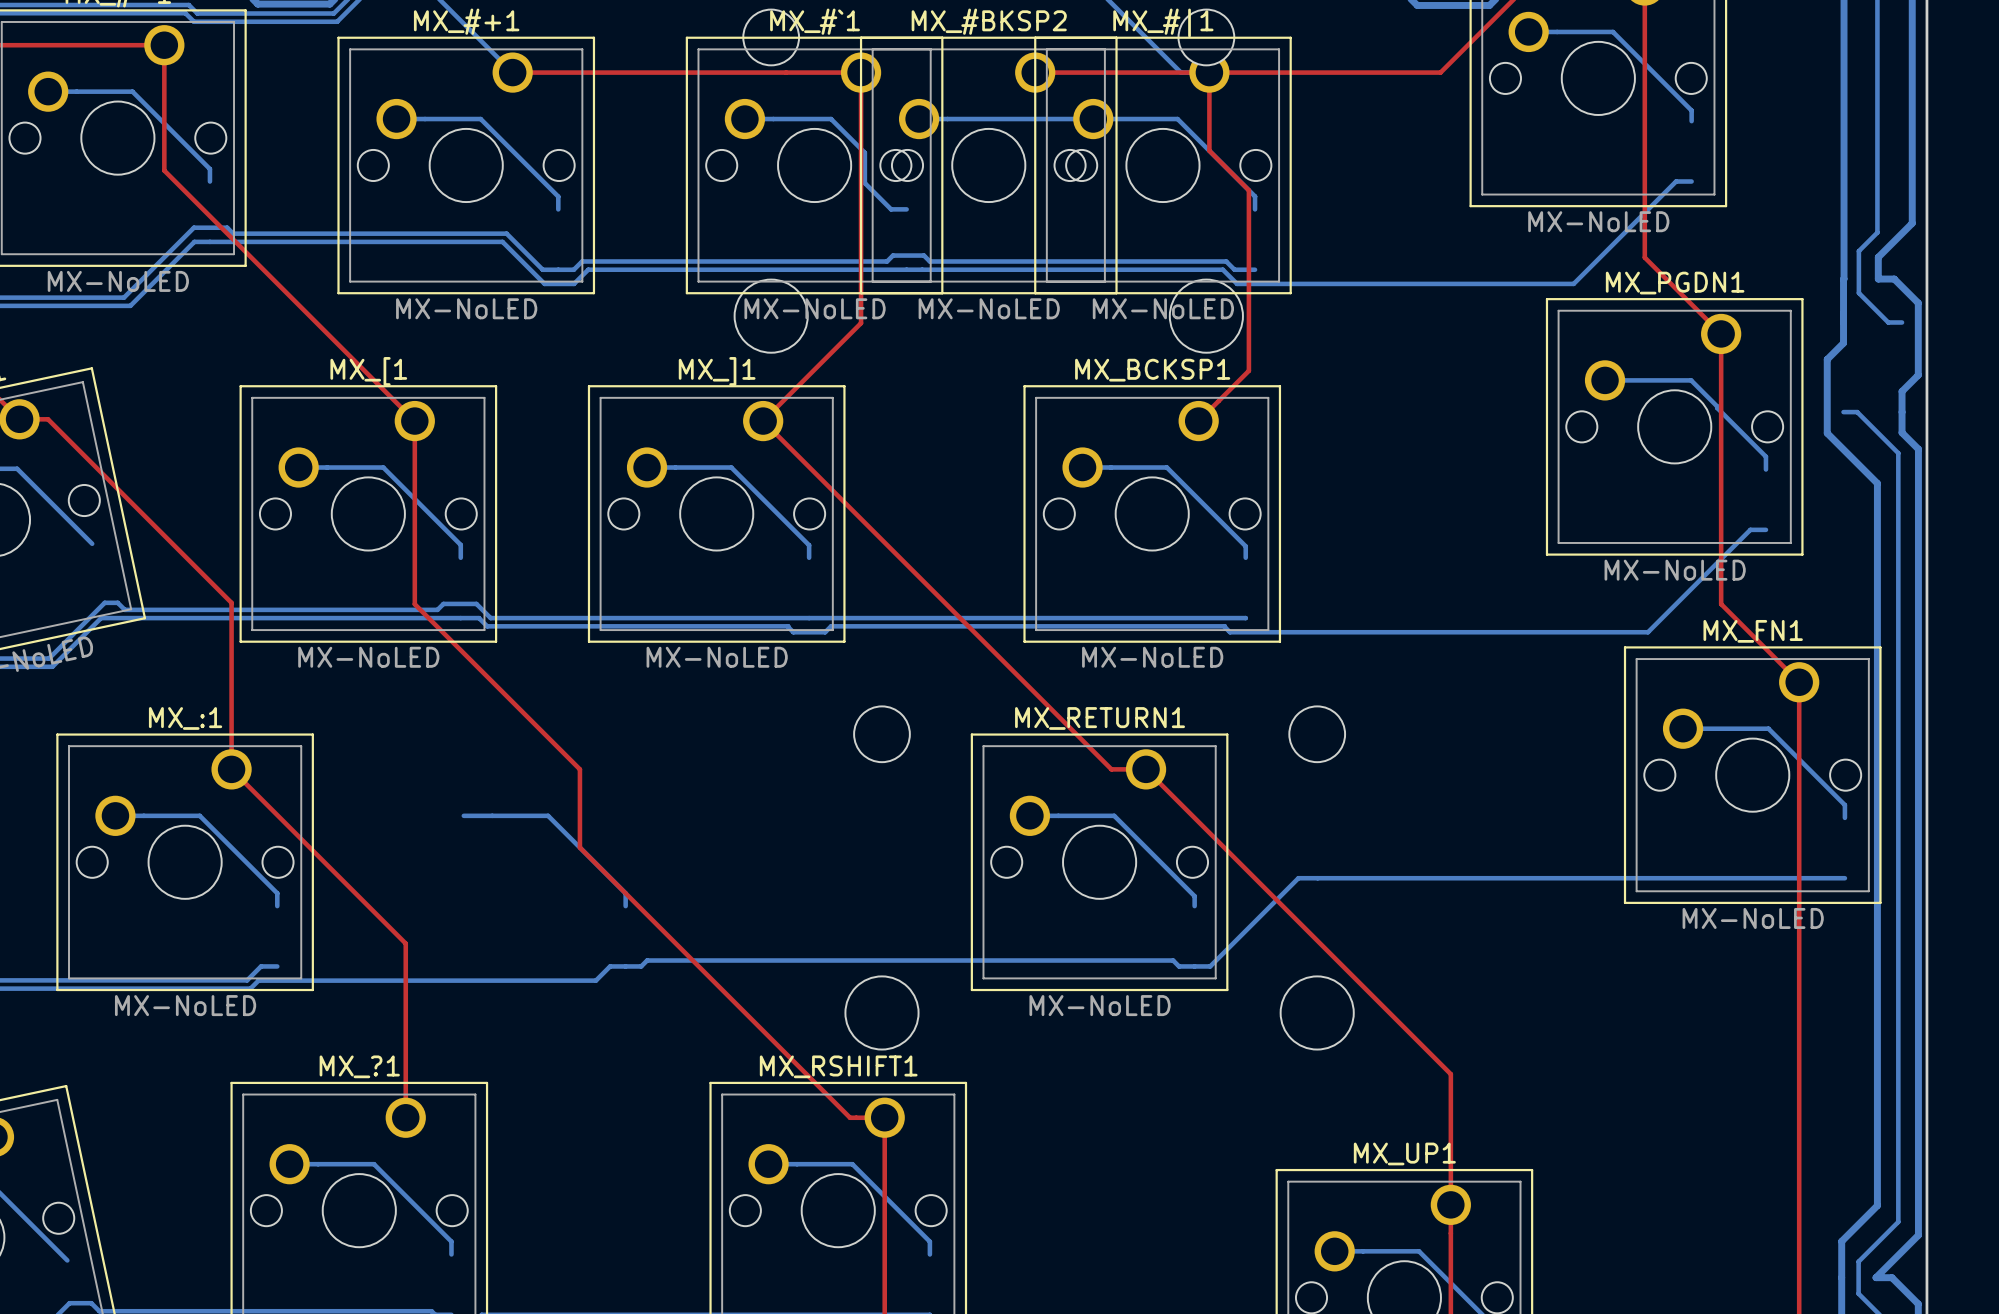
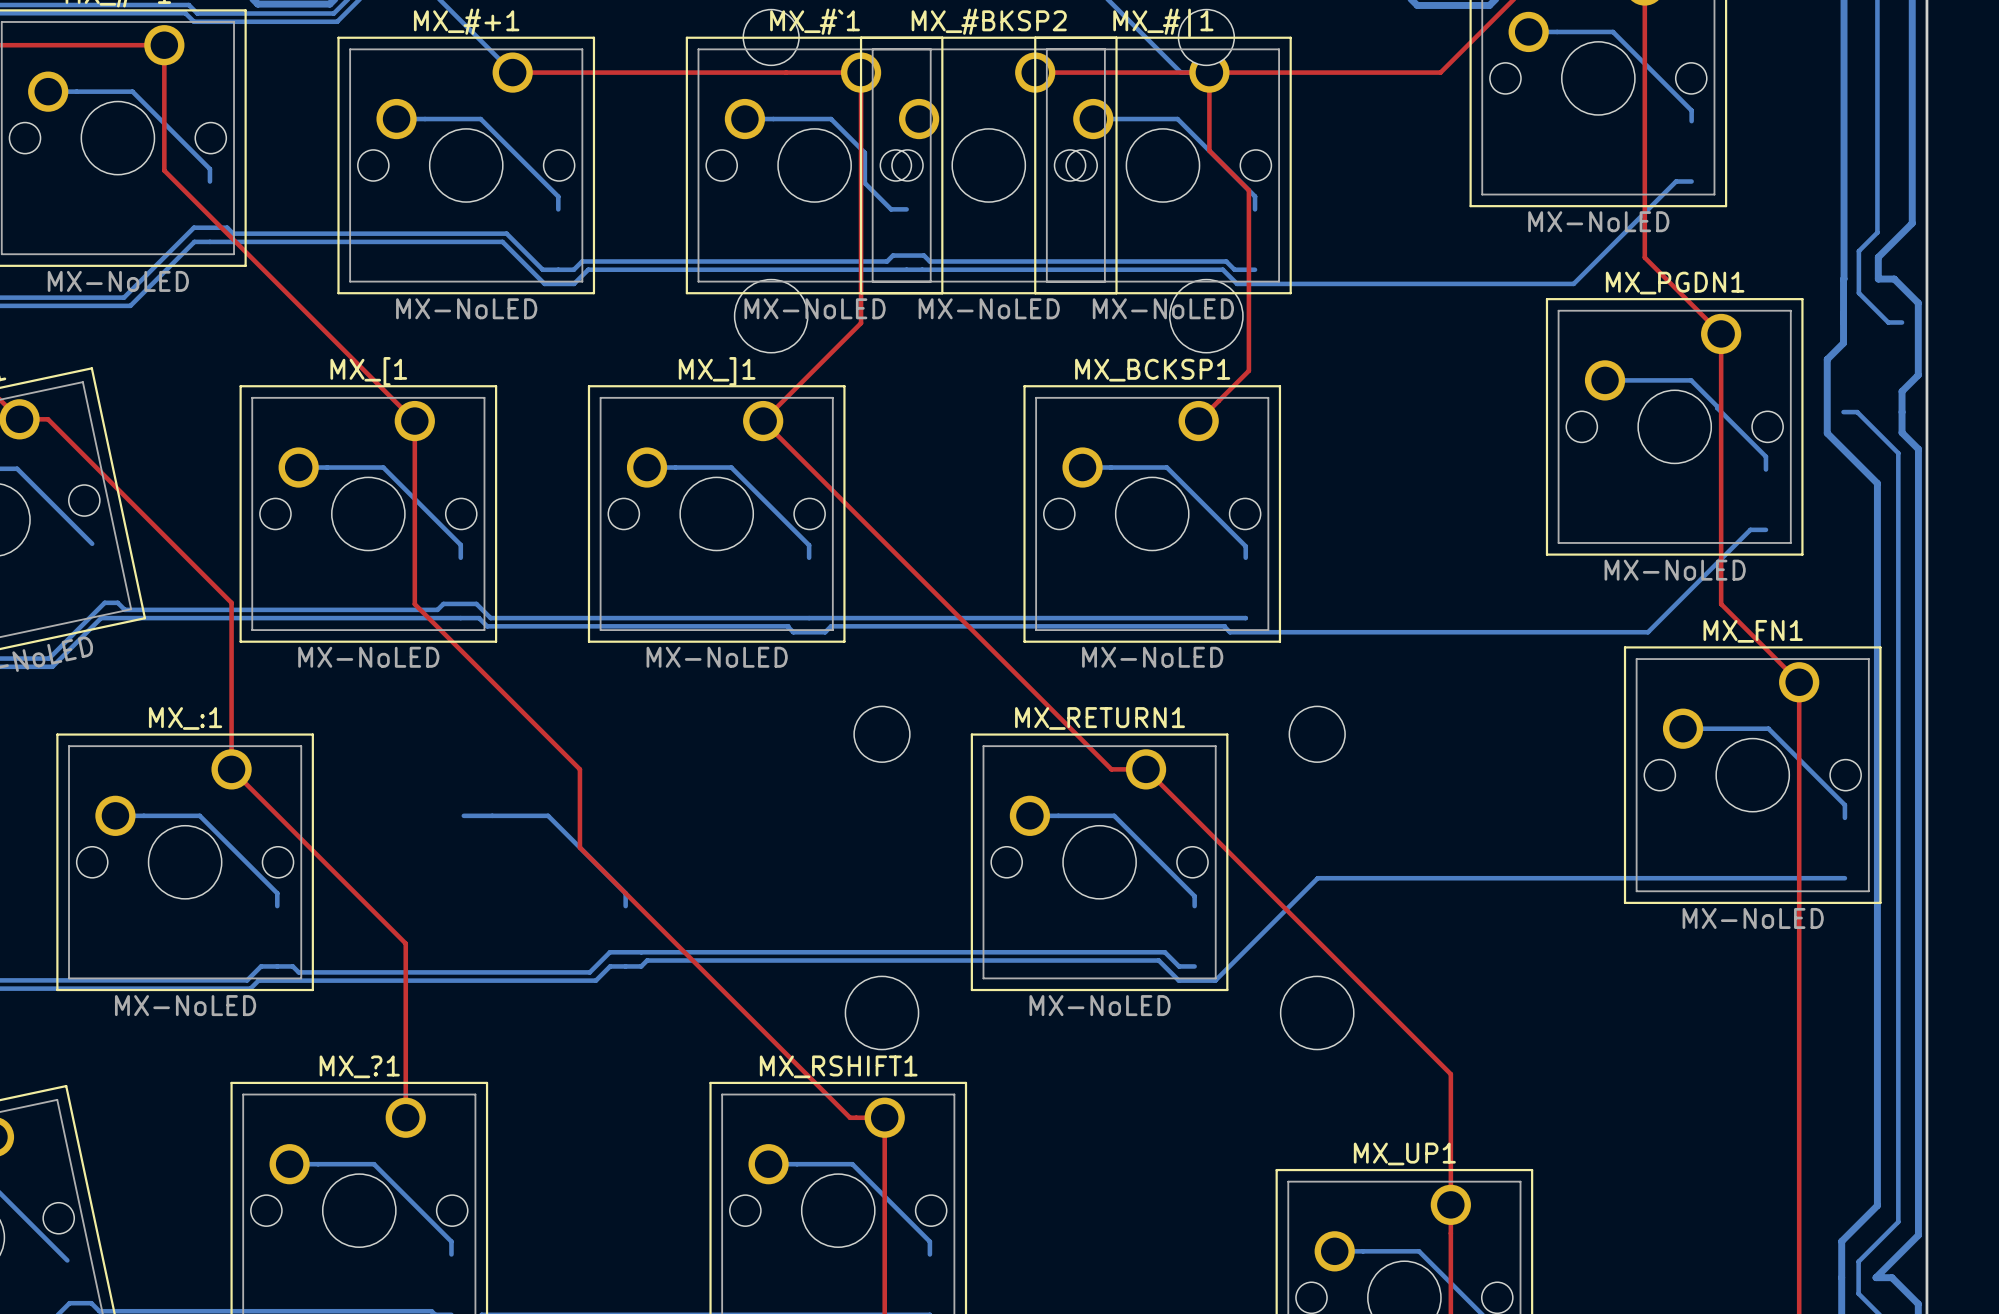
bottom track: (919, 119) (1093, 119) -> none
bottom track: (1317, 878) (1298, 878) (1210, 966) (1194, 966) -> (1317, 878) (1215, 980) (1178, 980) (1158, 960)
bottom track: (1158, 960) (1173, 960) -> (277, 966) (292, 966) (298, 972) (589, 972) (609, 952) (1164, 952) (1173, 960)

